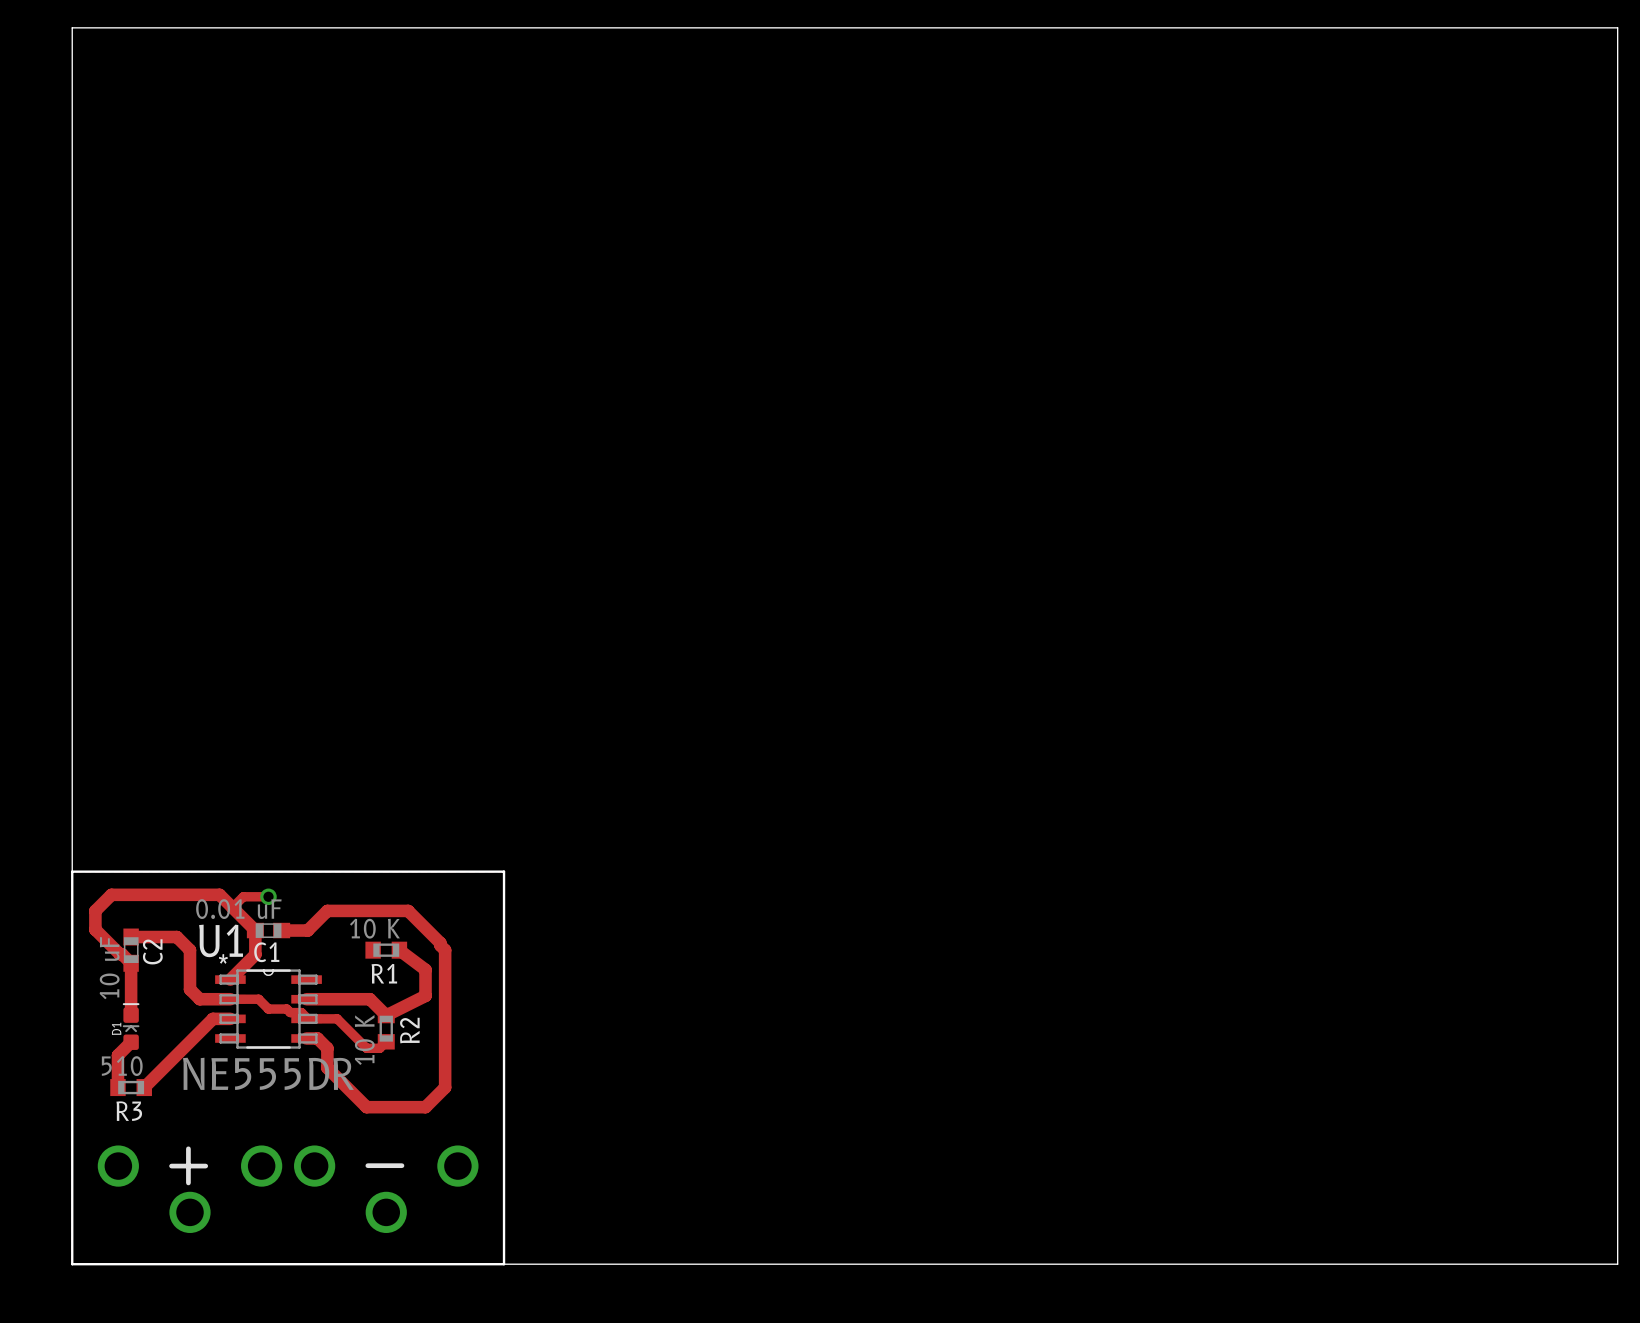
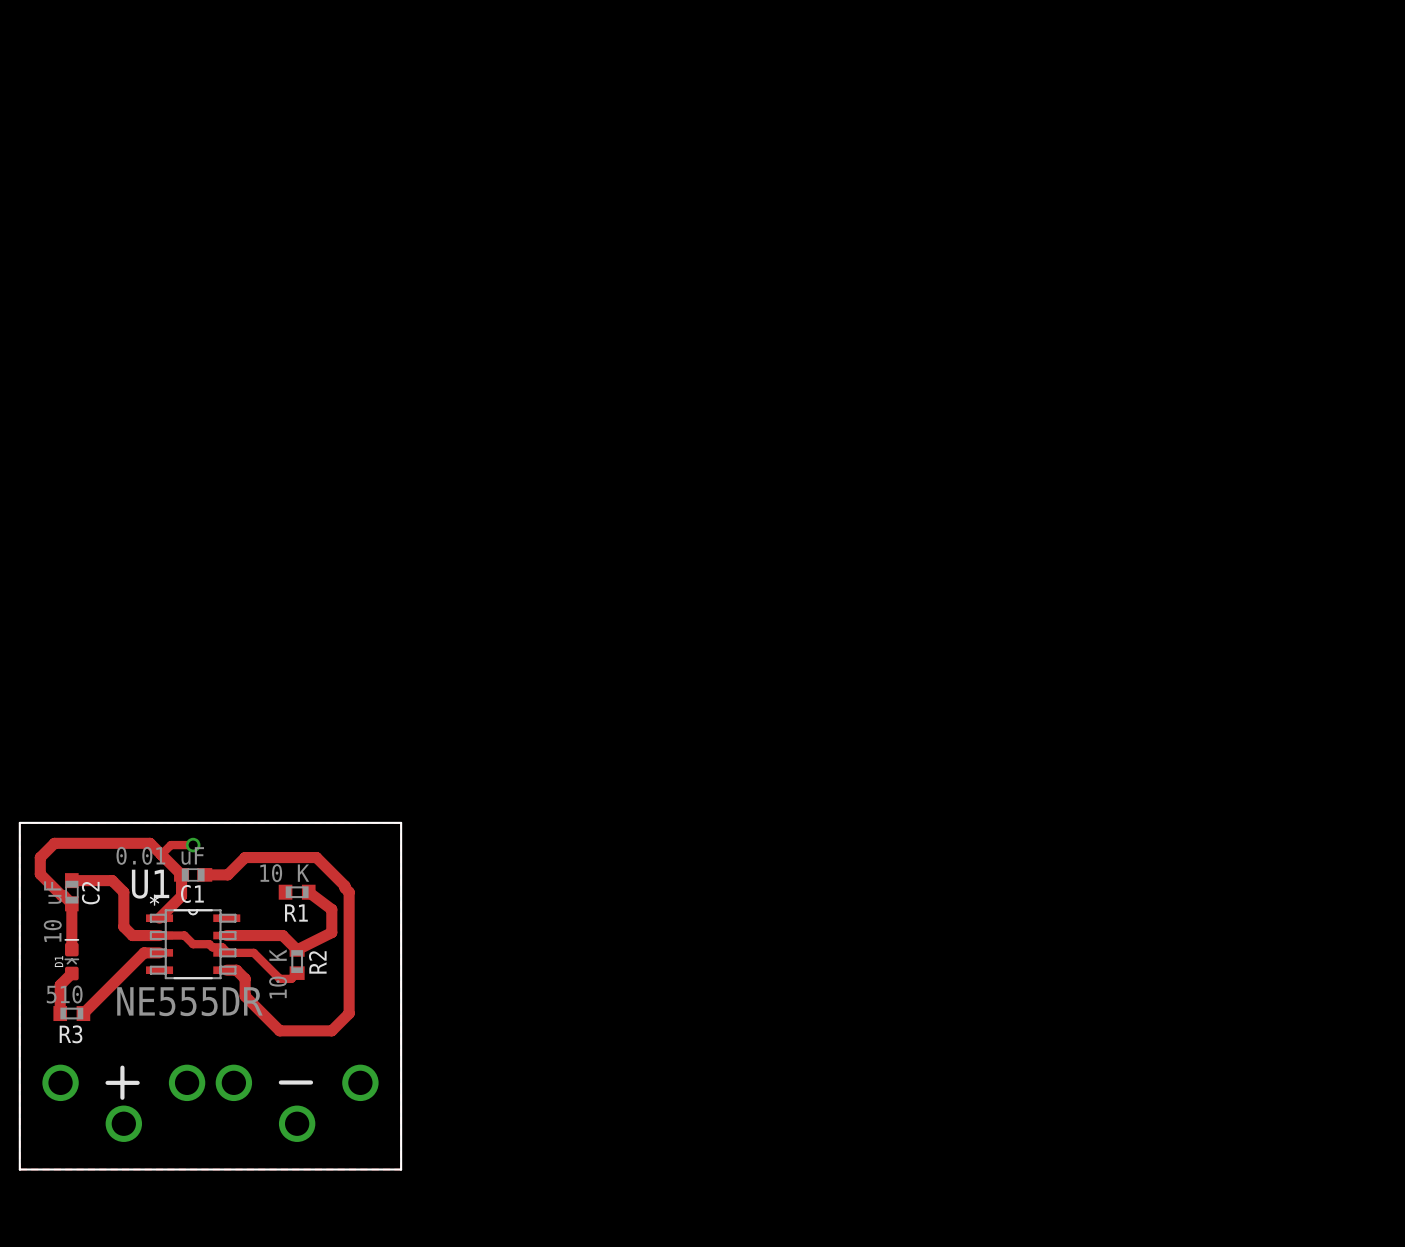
board edge: (72, 871) (72, 27) (1617, 27) (1617, 1264) (504, 1264) -> none

